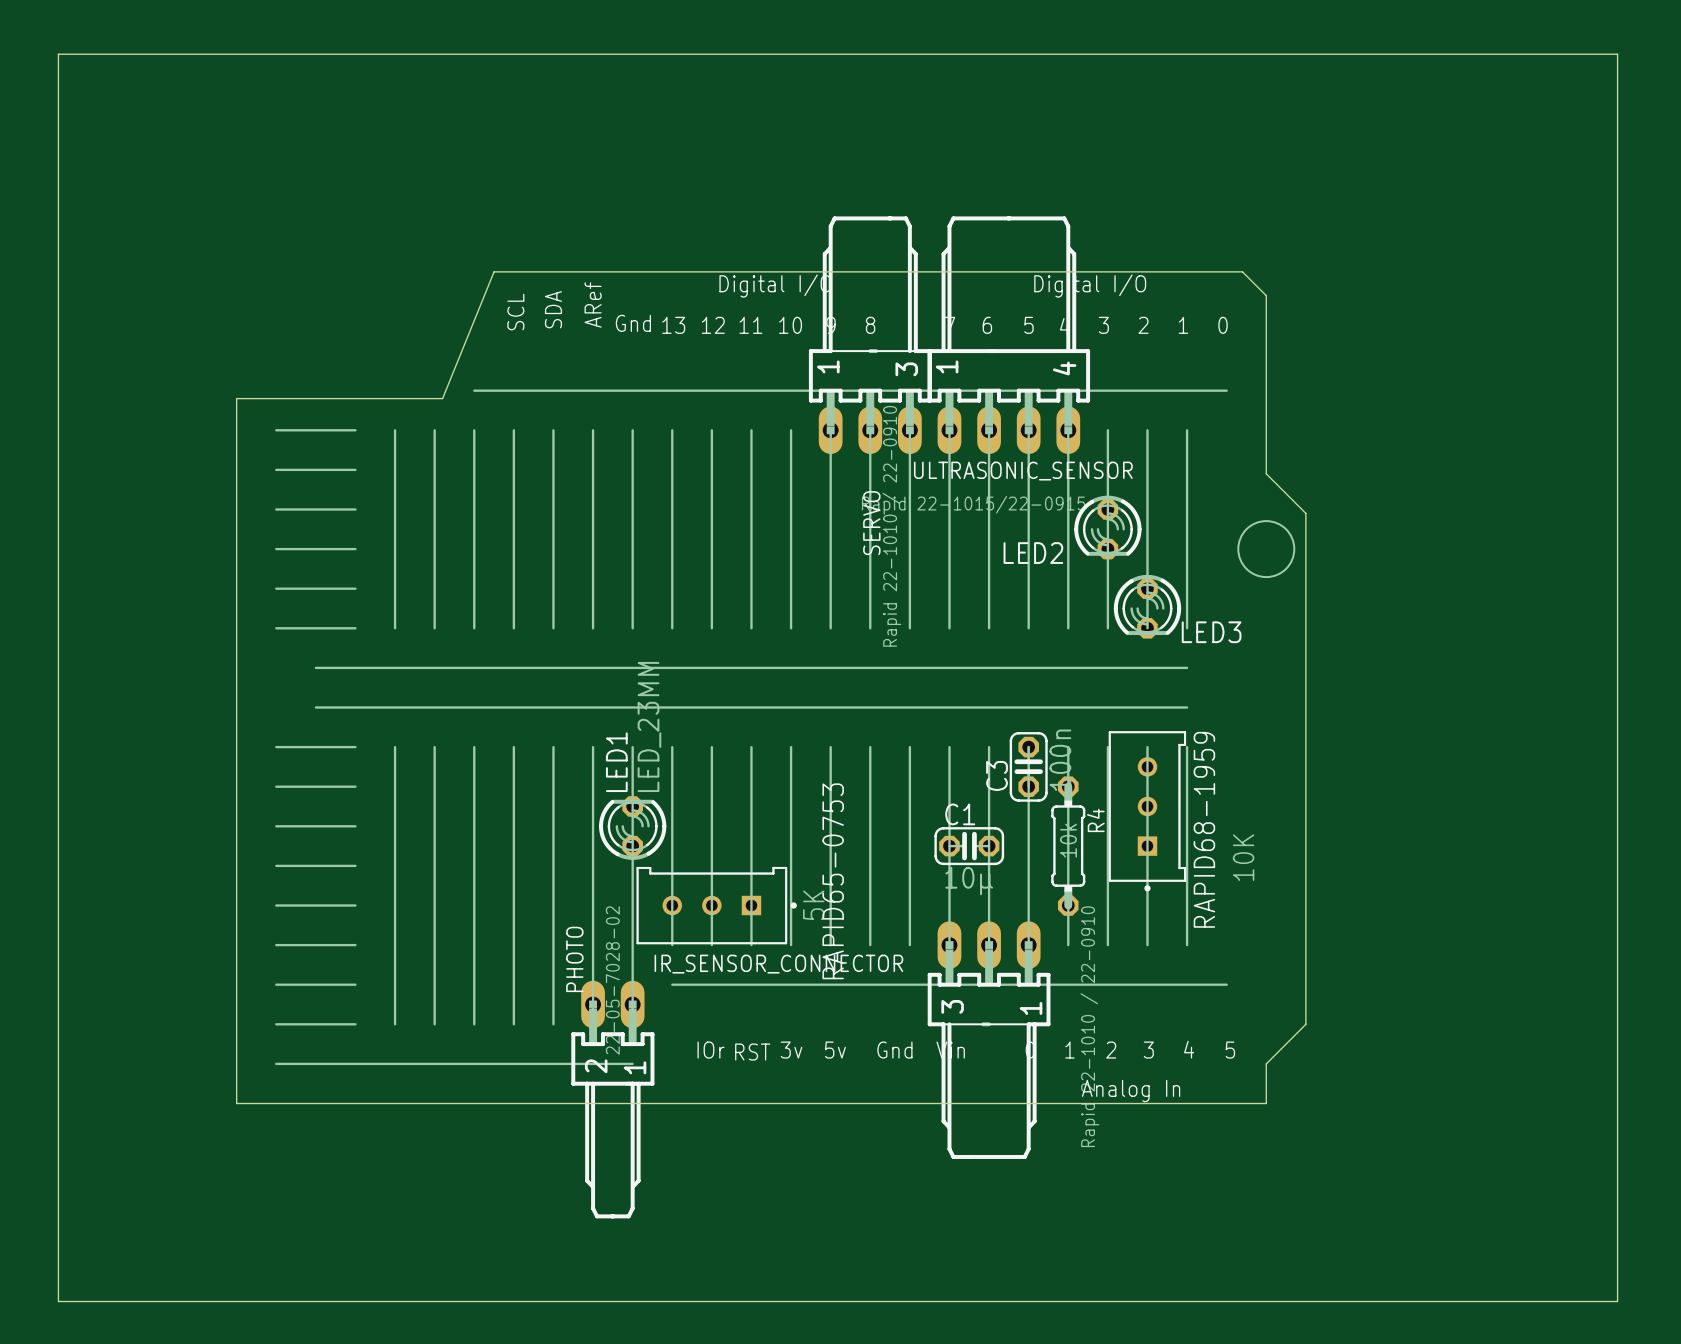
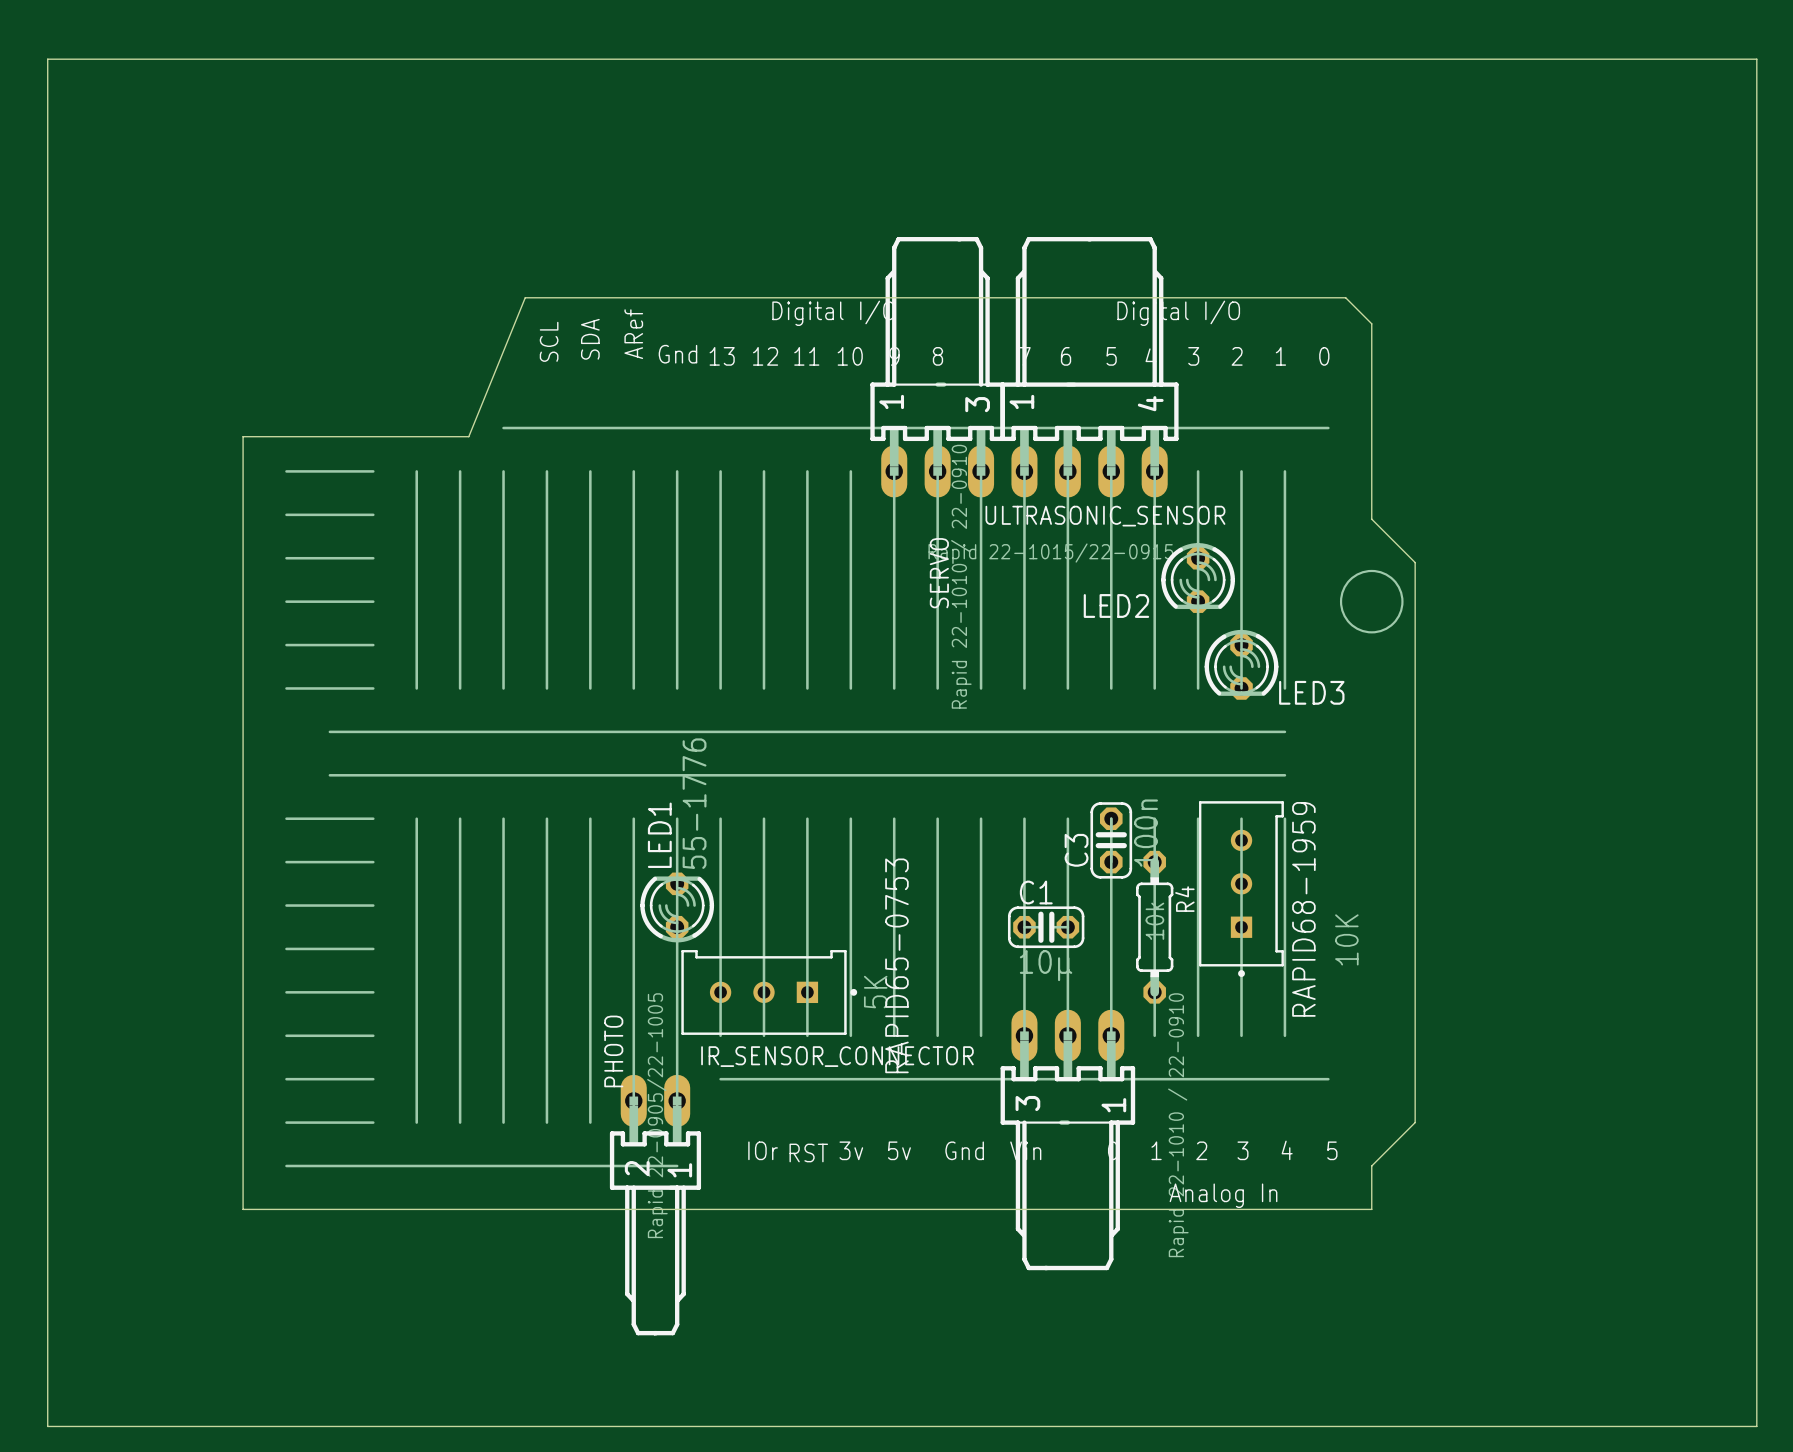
LED1 value: LED_23MM (649, 726) -> 55-1776 (694, 803)
PHOTO value: 22-05-7028-02 (612, 980) -> Rapid 22-0905/22-1005 (657, 1115)

